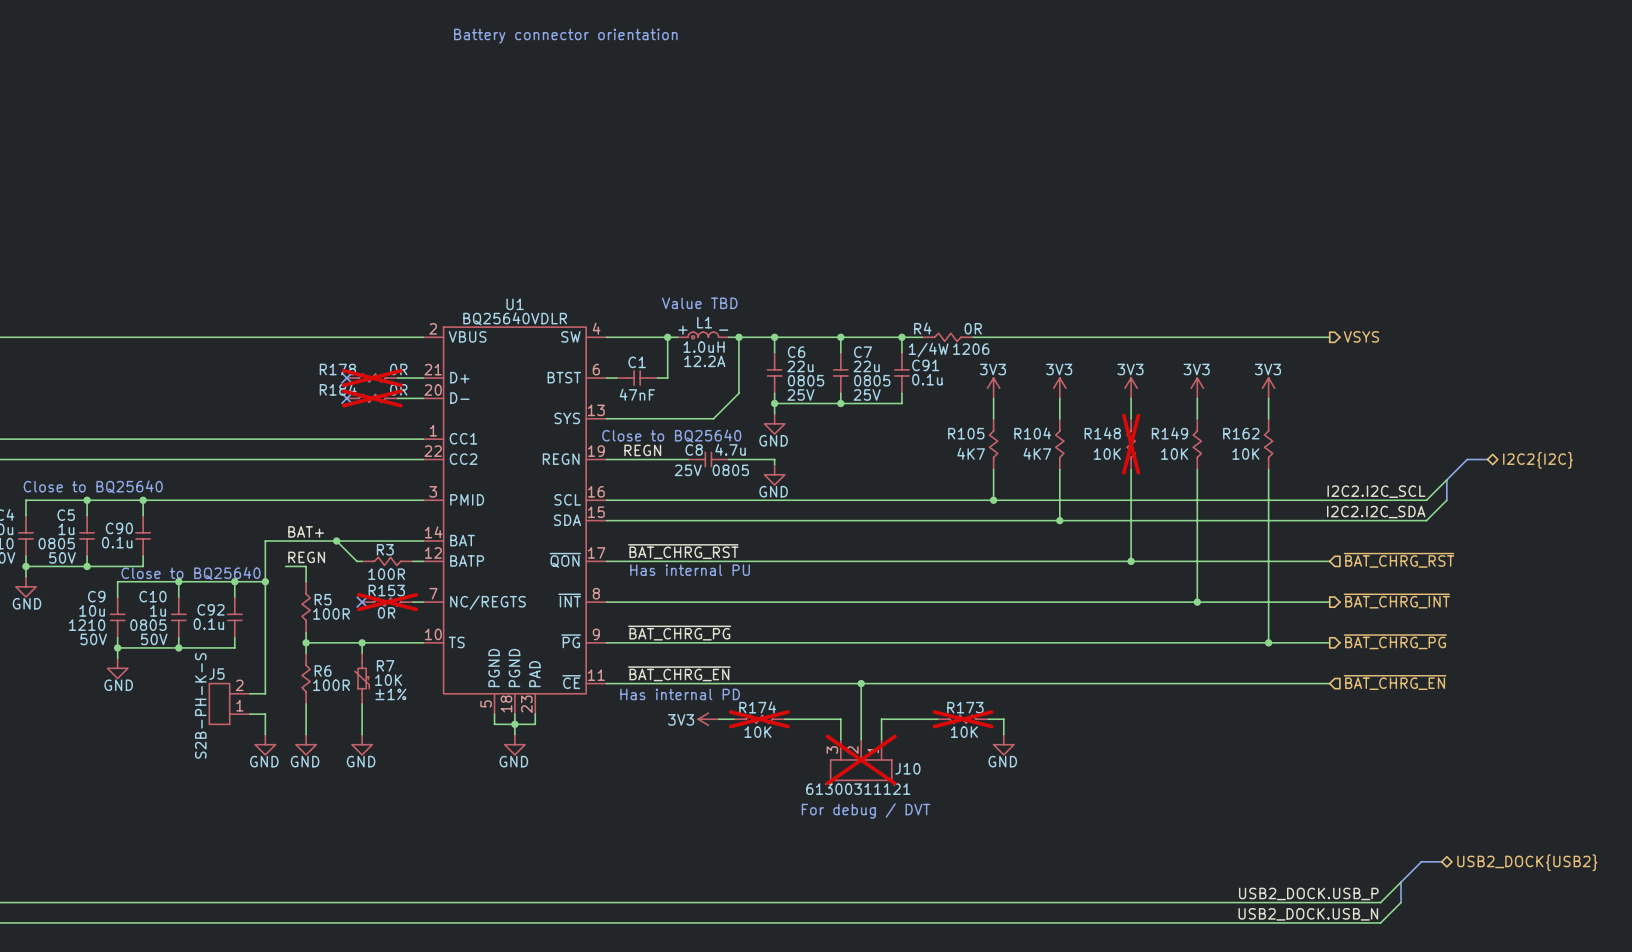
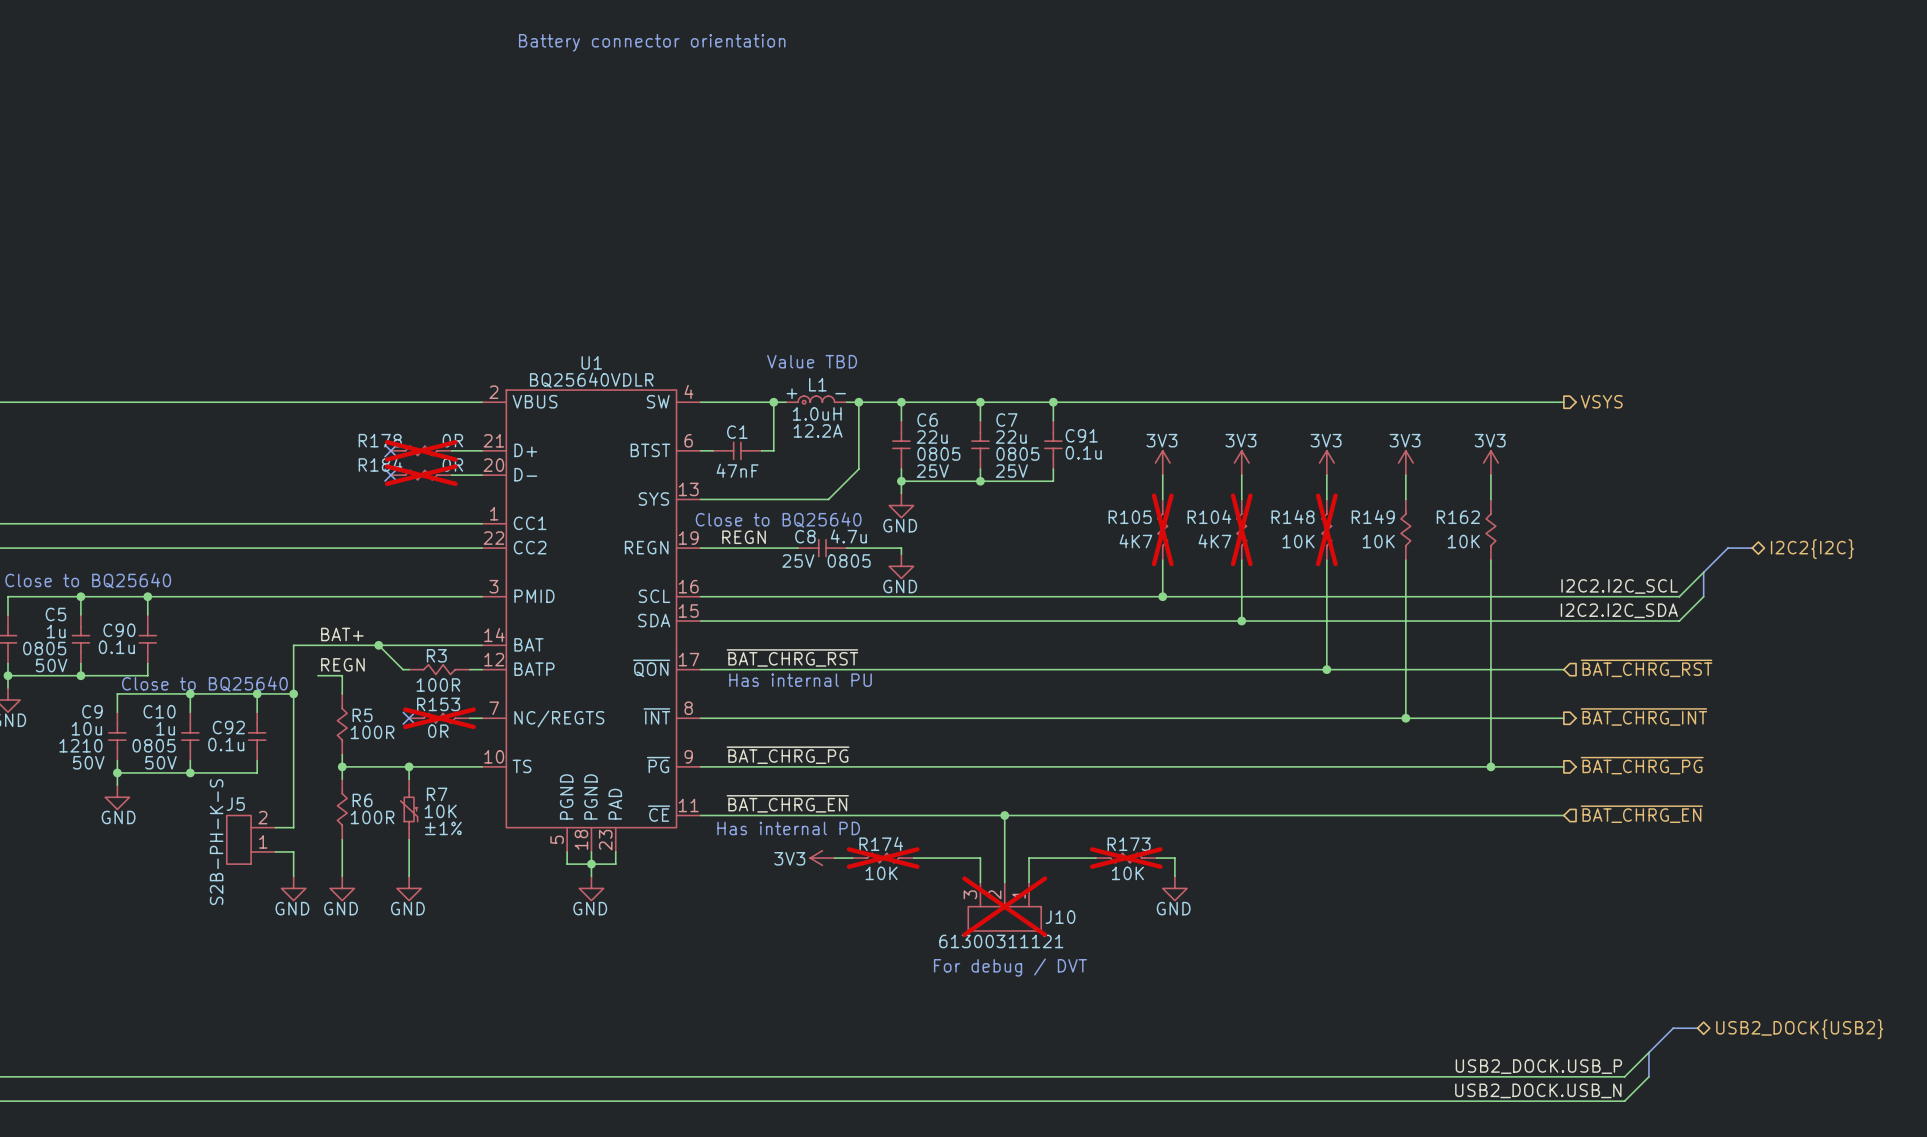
R4: 0R (947, 337) -> none
R105 do-not-place cross: none -> (1162, 529)
R104 do-not-place cross: none -> (1241, 529)

